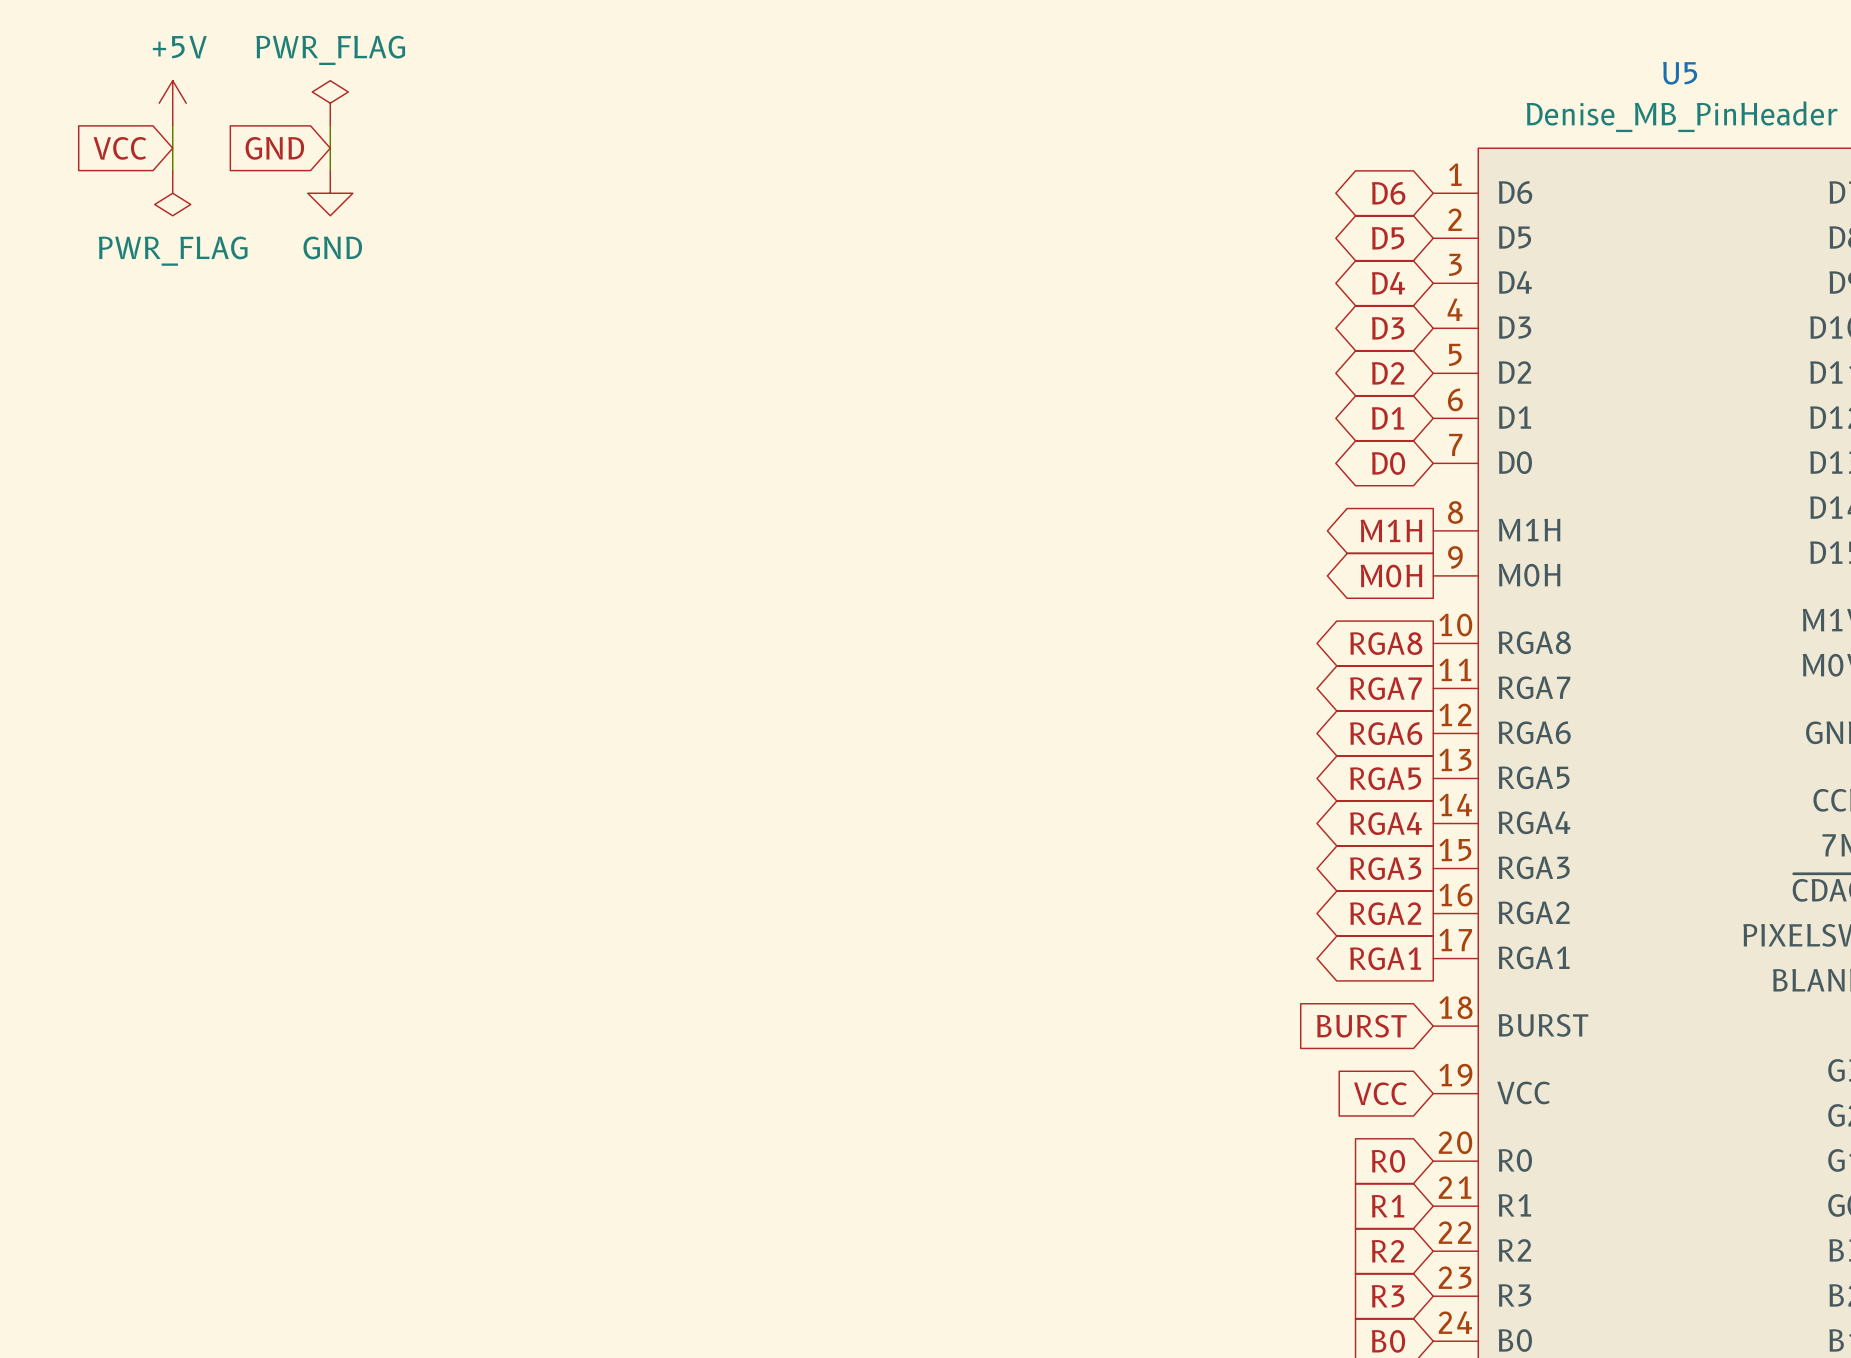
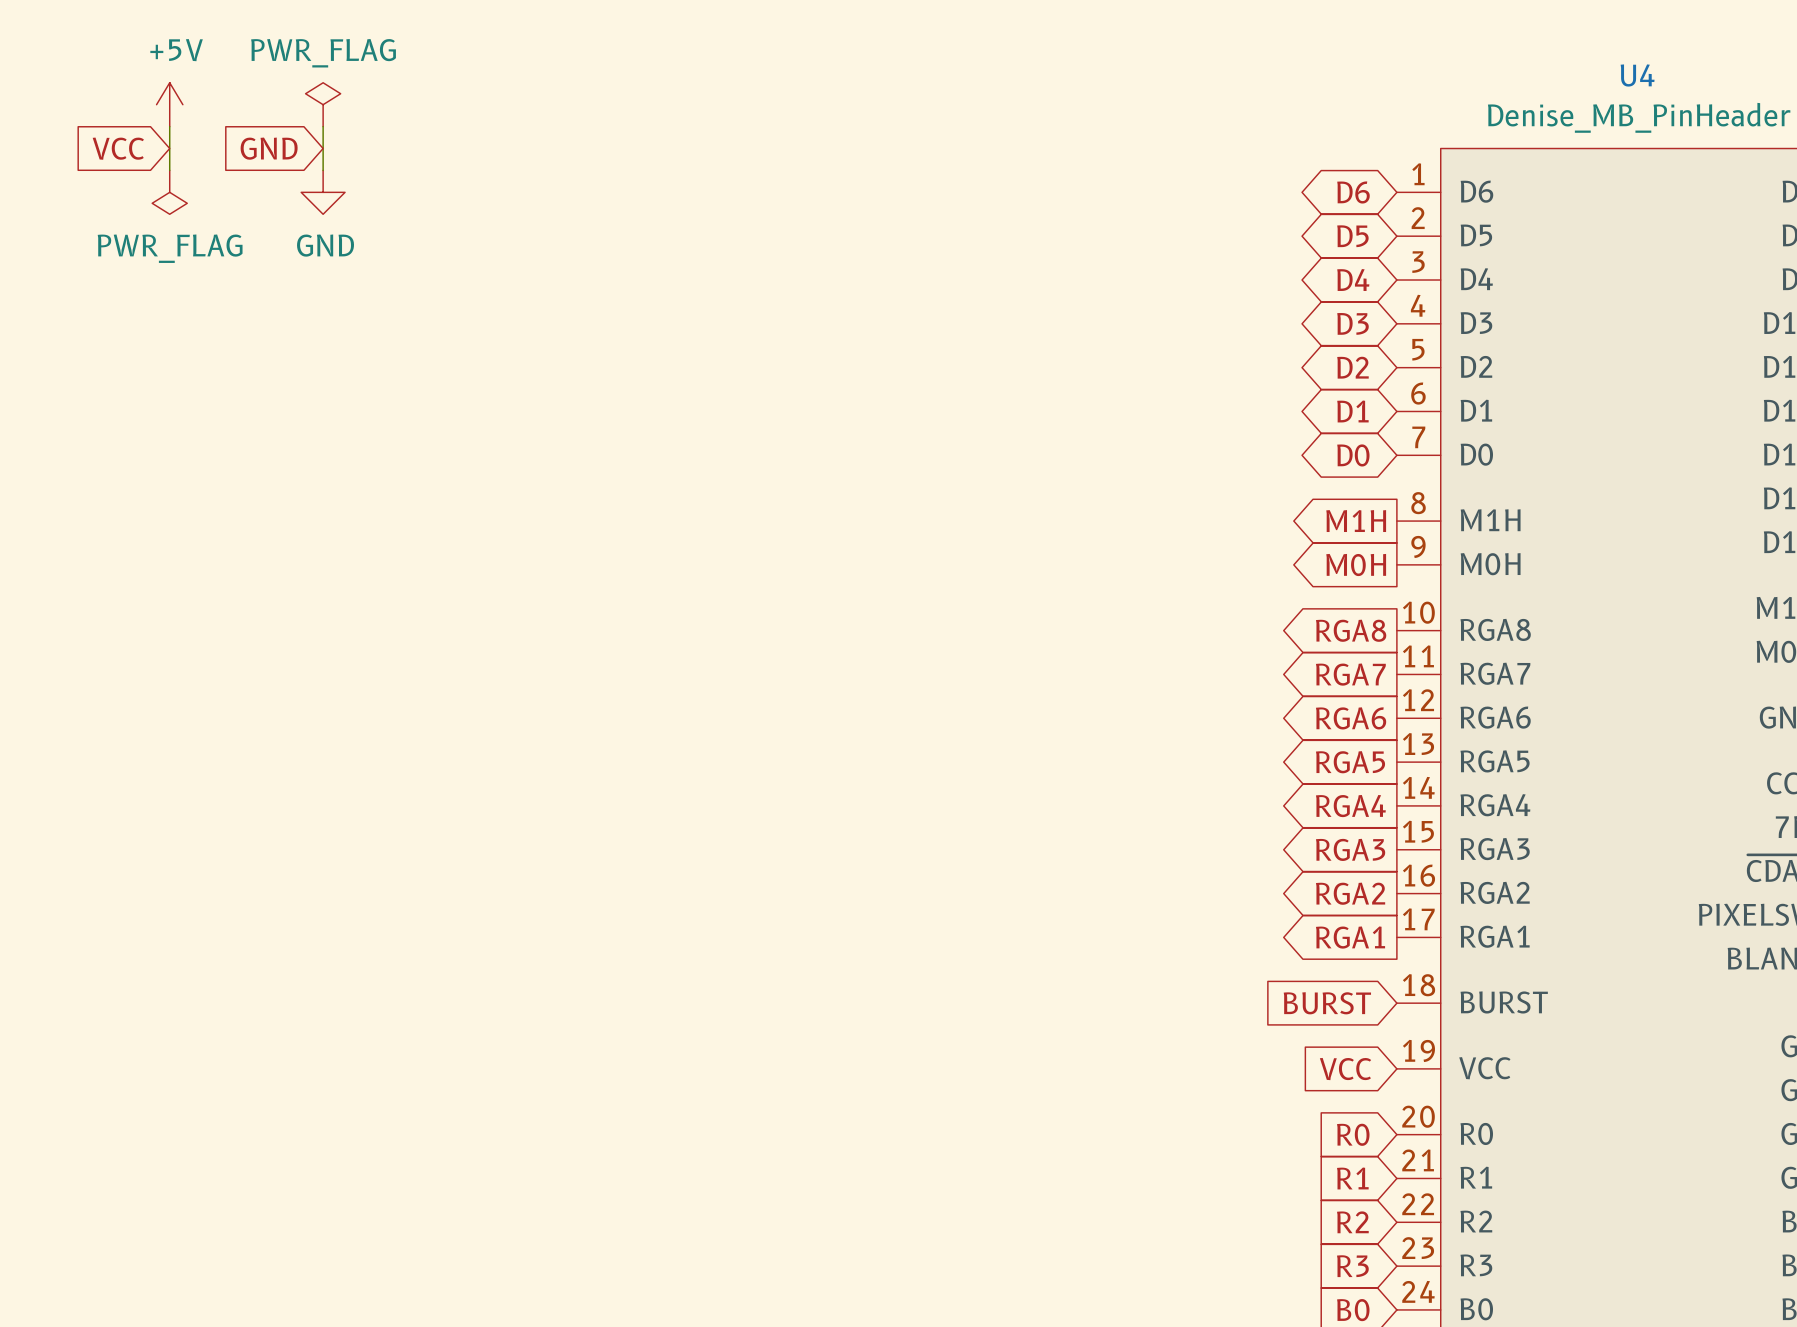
U5 name: U5 (1680, 73) -> U4 (1637, 75)

